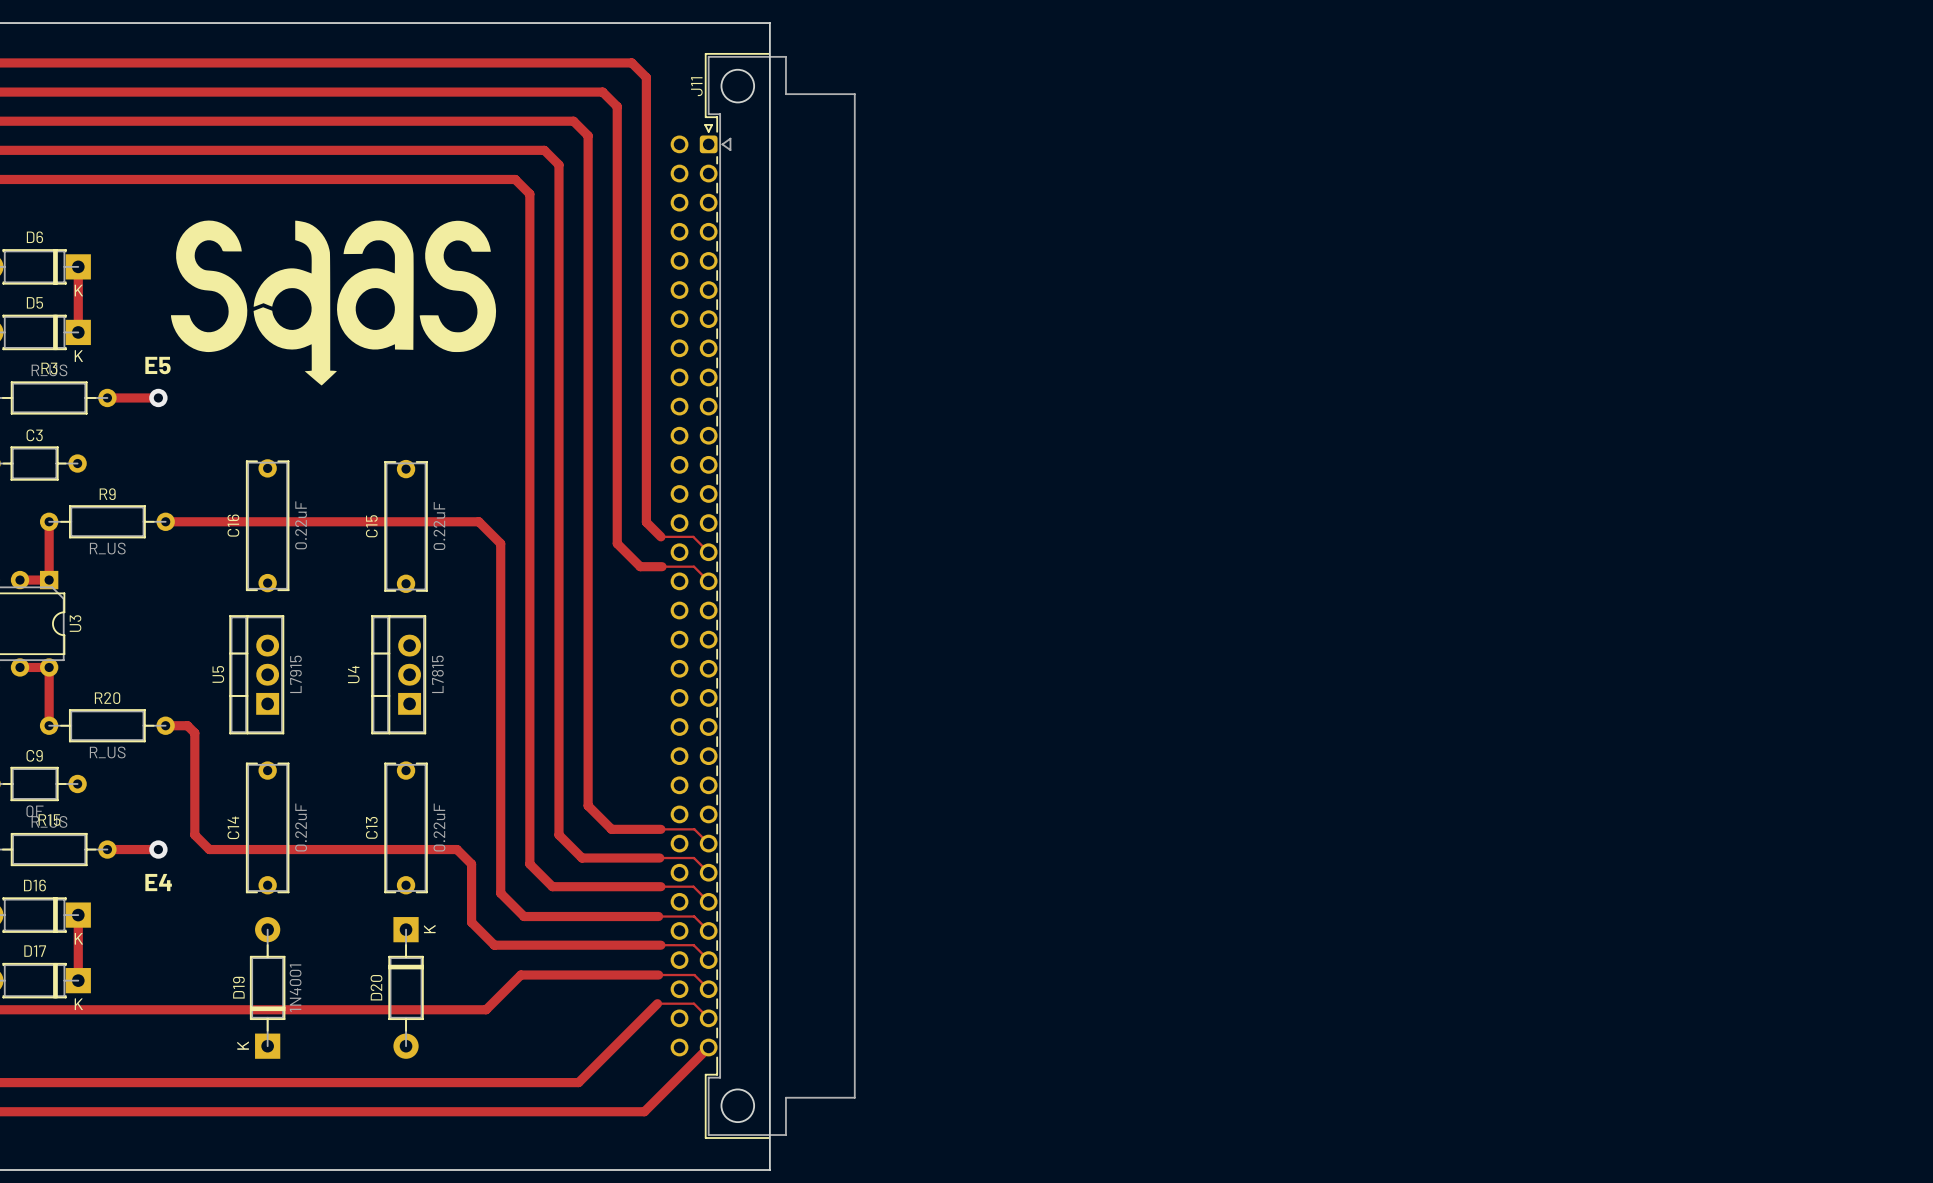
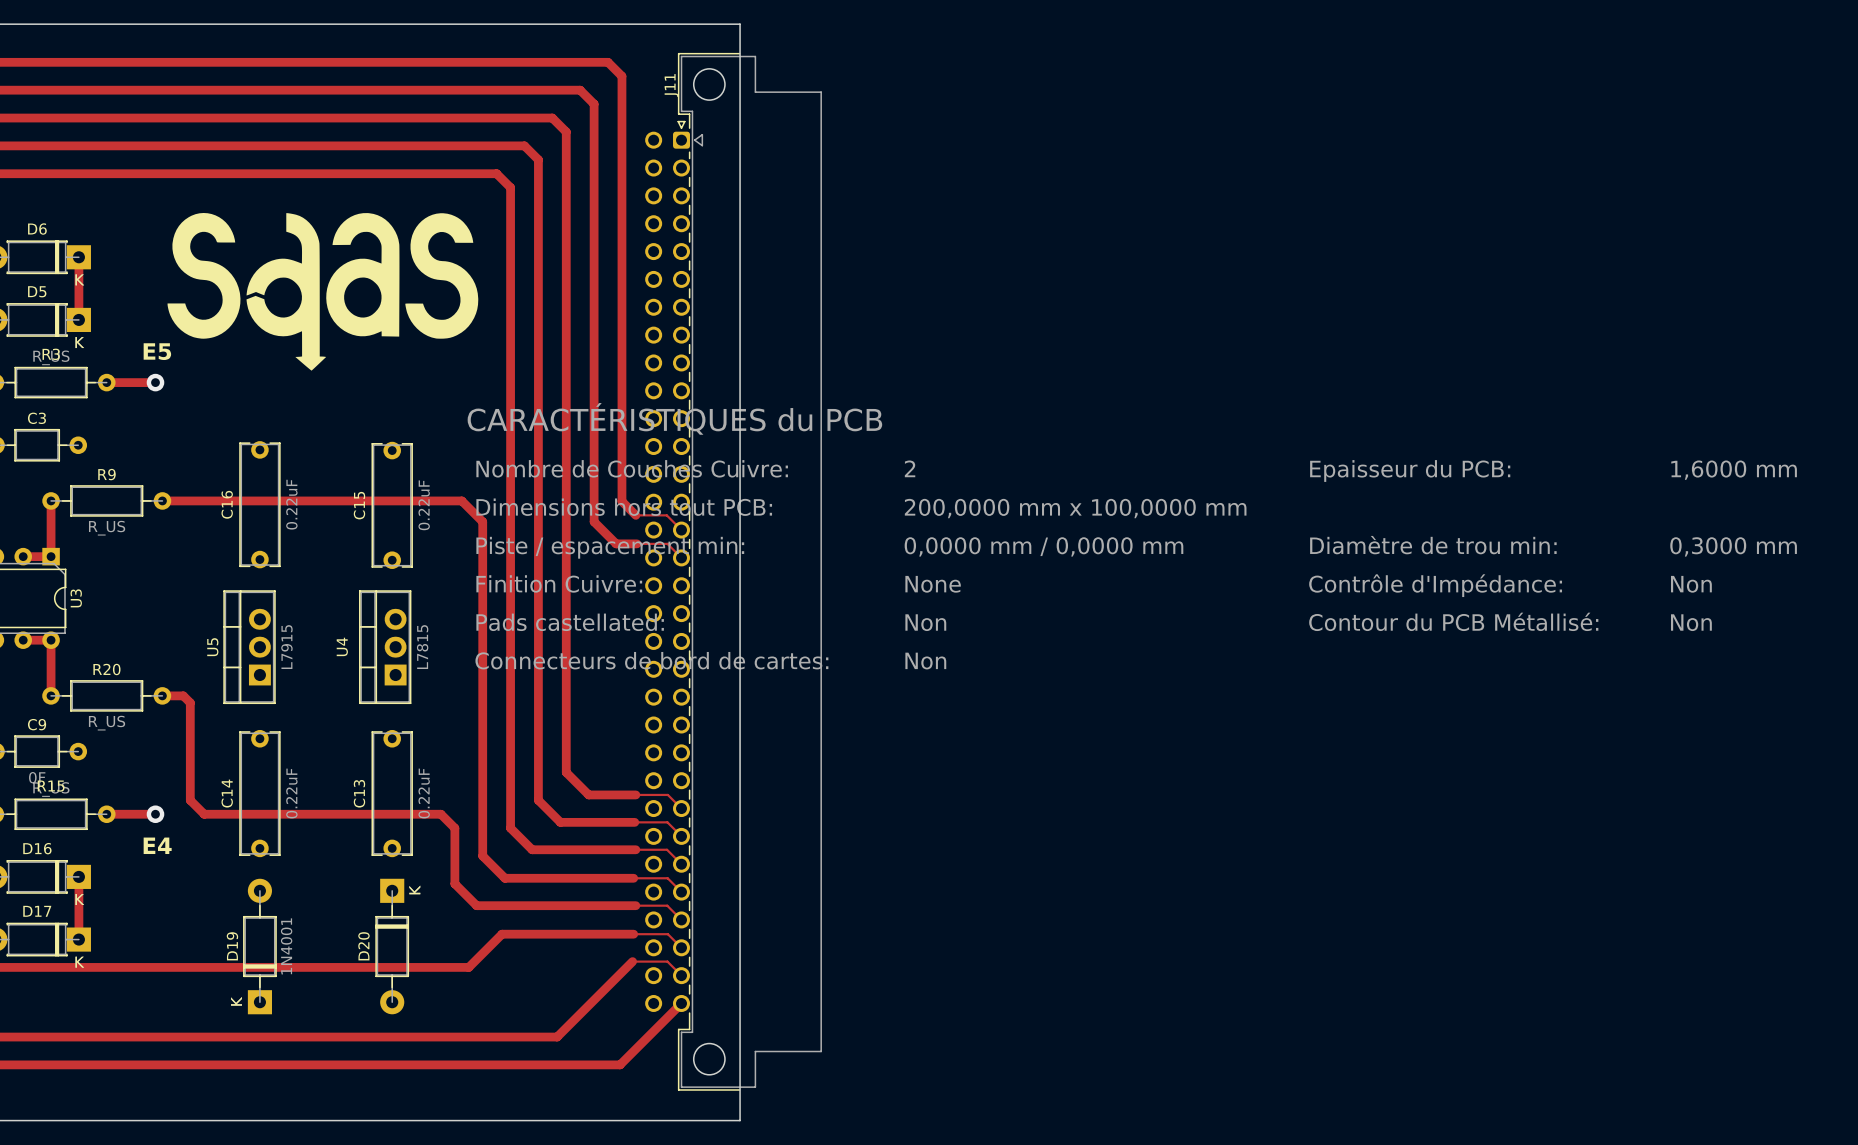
text: none -> CARACTÉRISTIQUES du PCB (674, 418)
text: none -> Nombre de Couches Cuivre: (632, 468)
text: none -> 2 (910, 468)
text: none -> 1,6000 mm (1734, 470)
text: none -> Epaisseur du PCB: (1410, 471)
text: none -> Dimensions hors tout PCB: (624, 507)
text: none -> 200,0000 mm x 100,0000 mm (1075, 508)
text: none -> Diamètre de trou min: (1433, 545)
text: none -> 0,0000 mm / 0,0000 mm (1043, 546)
text: none -> 0,3000 mm (1733, 546)
text: none -> Piste / espacement min: (610, 547)
text: none -> Finition Cuivre: (559, 583)
text: none -> None (933, 584)
text: none -> Non (1691, 584)
text: none -> Contrôle d'Impédance: (1435, 585)
text: none -> Contour du PCB Métallisé: (1453, 621)
text: none -> Pads castellated: (570, 622)
text: none -> Non (925, 622)
text: none -> Non (1691, 622)
text: none -> Connecteurs de bord de cartes: (651, 660)
text: none -> Non (925, 661)

